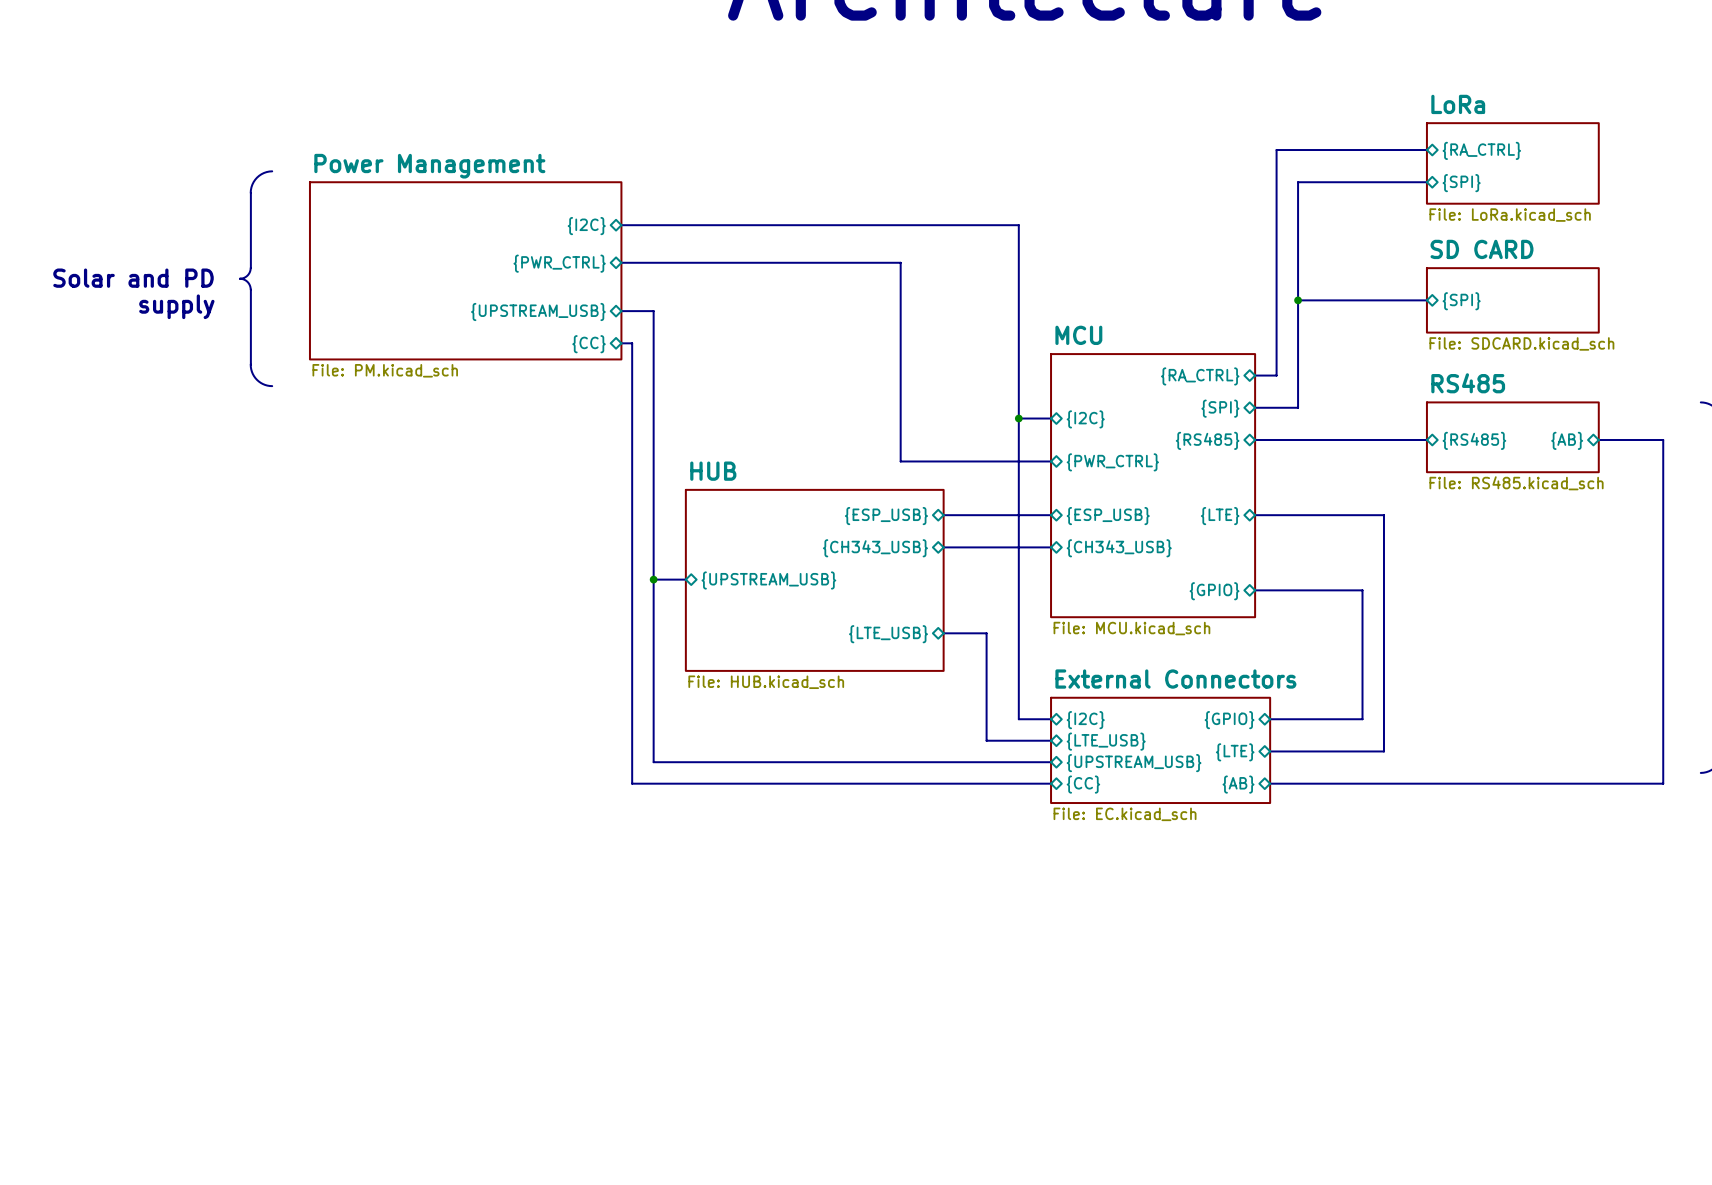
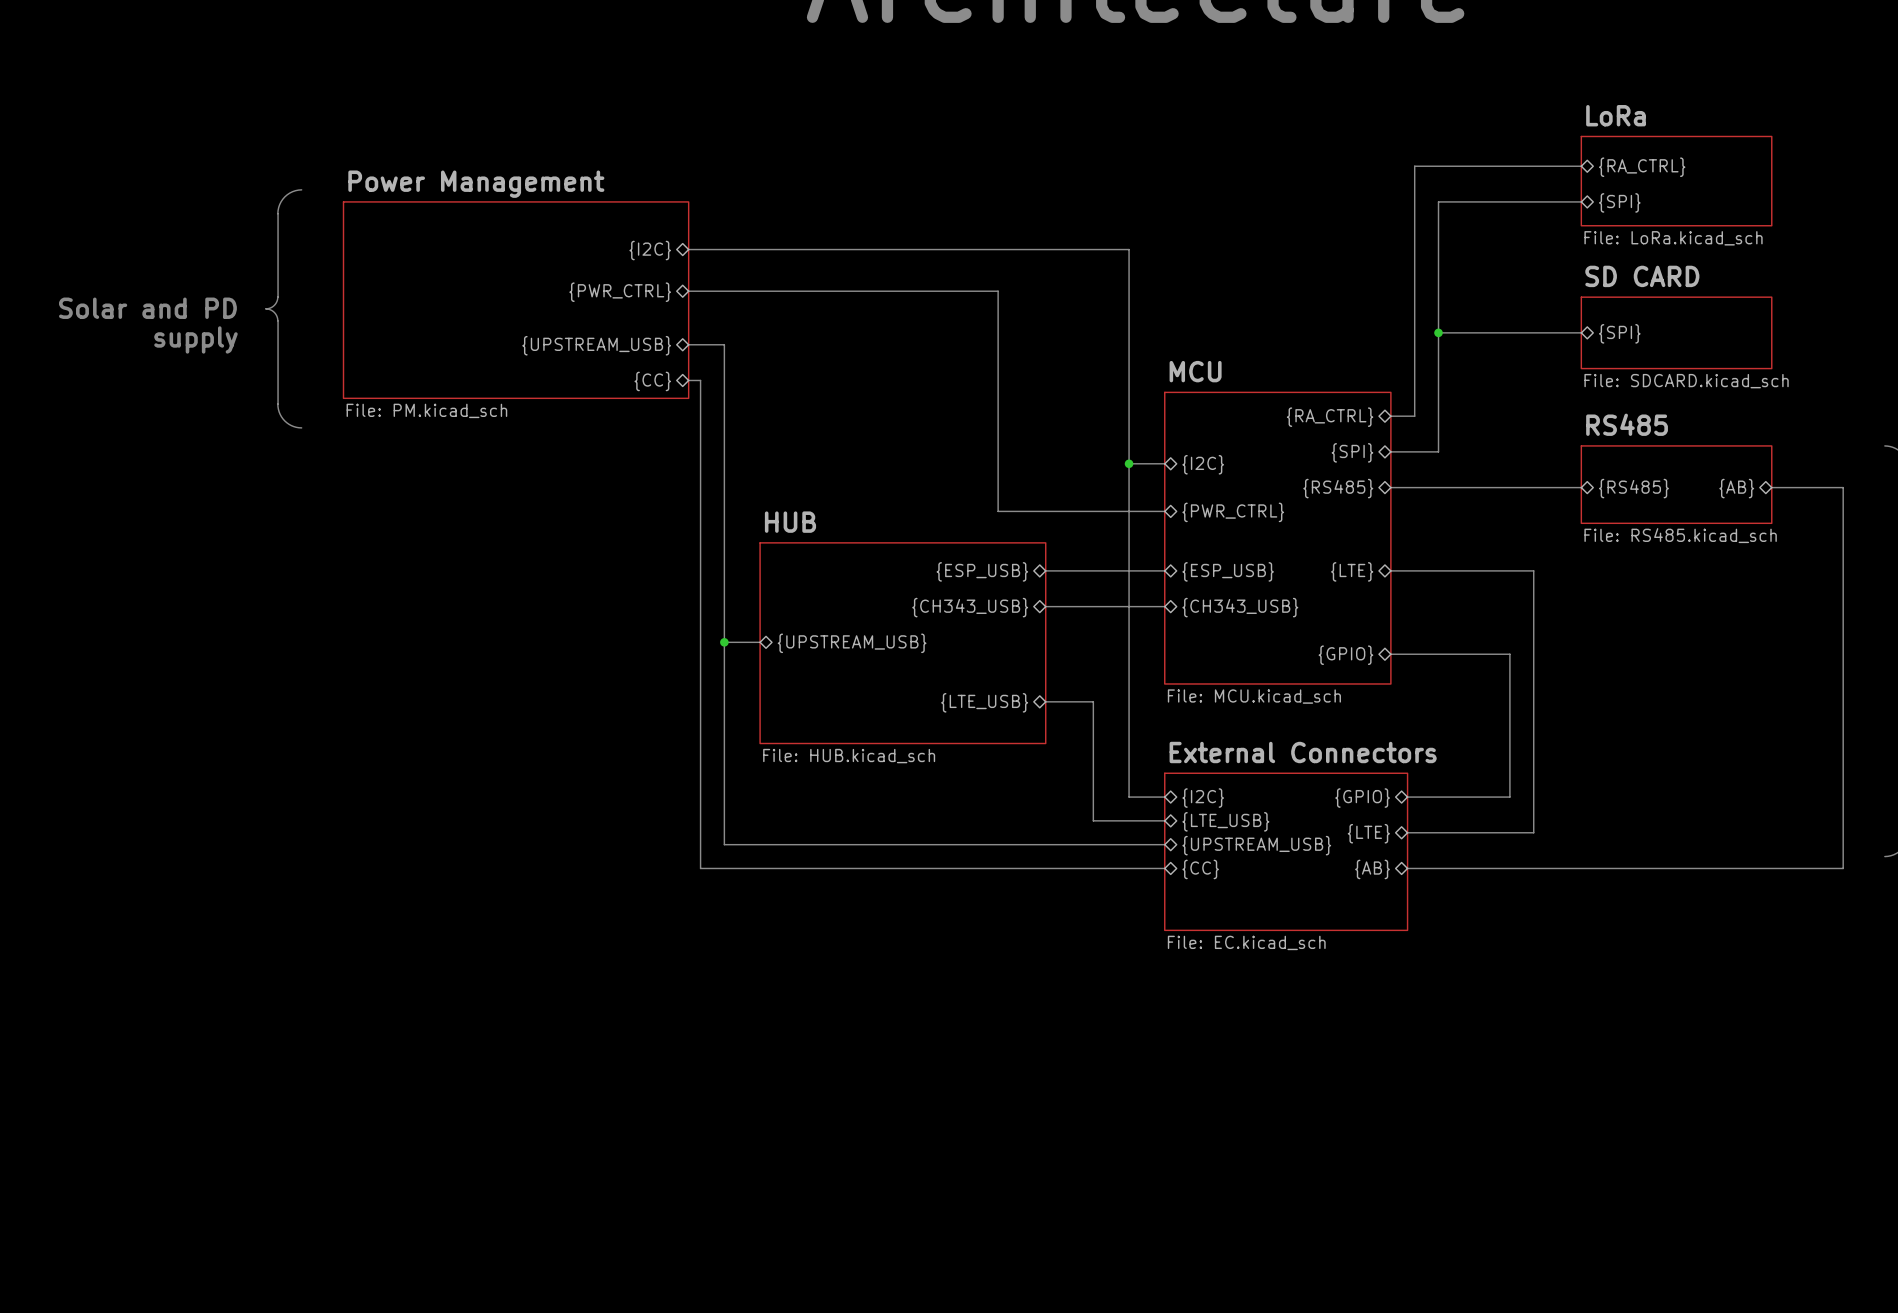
sheet External Connectors: File: EC.kicad_sch (1160, 750) -> none
sheet External Connectors: none -> File: EC.kicad_sch (1286, 851)

